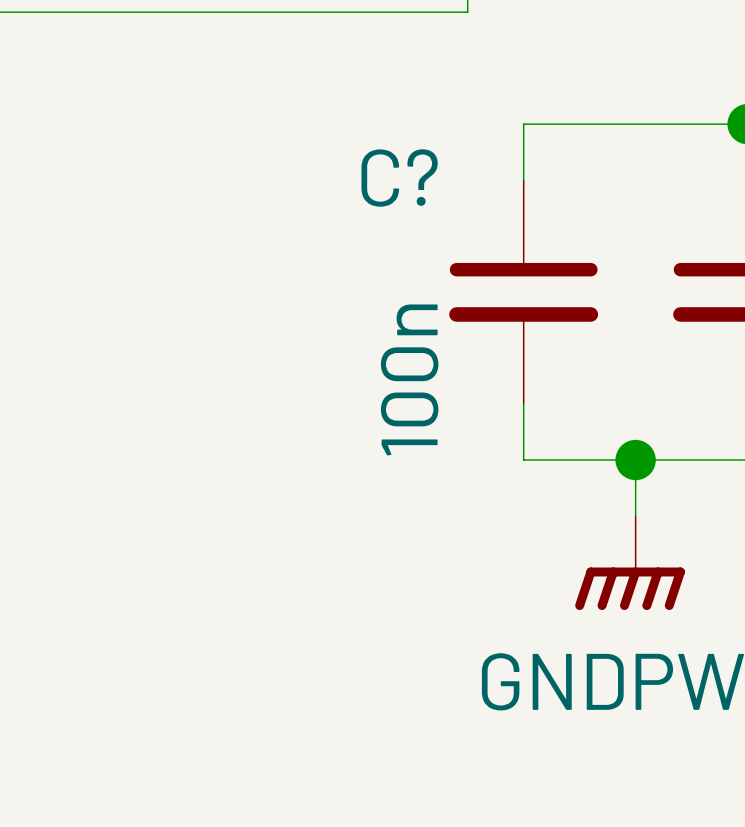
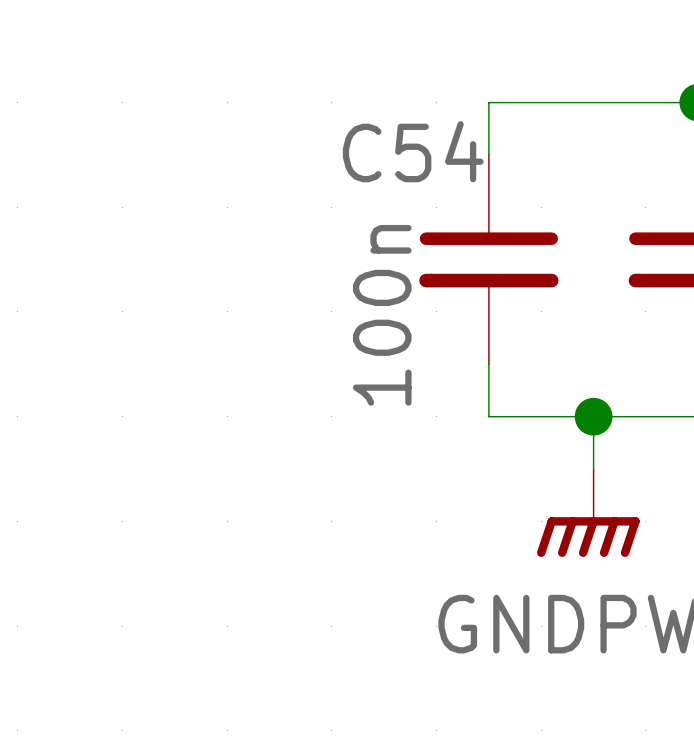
C? name: C? (399, 178) -> C54 (413, 151)

